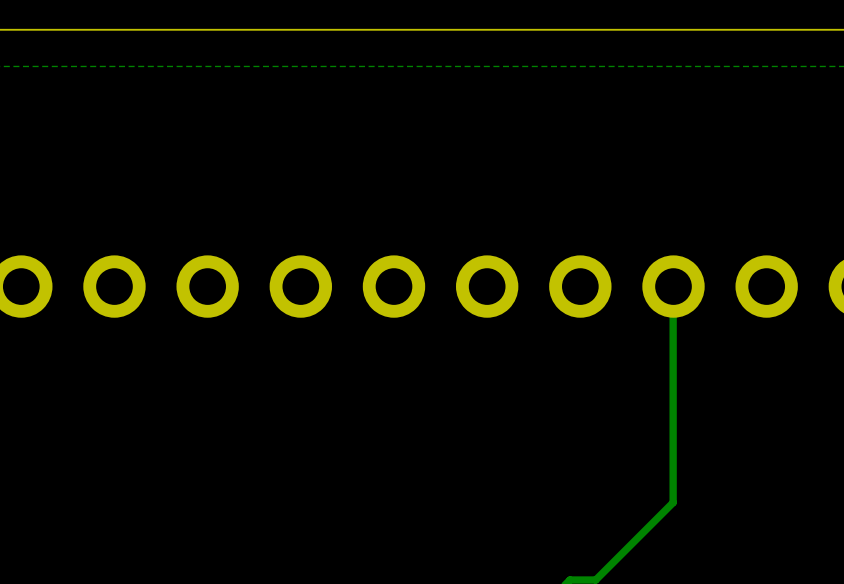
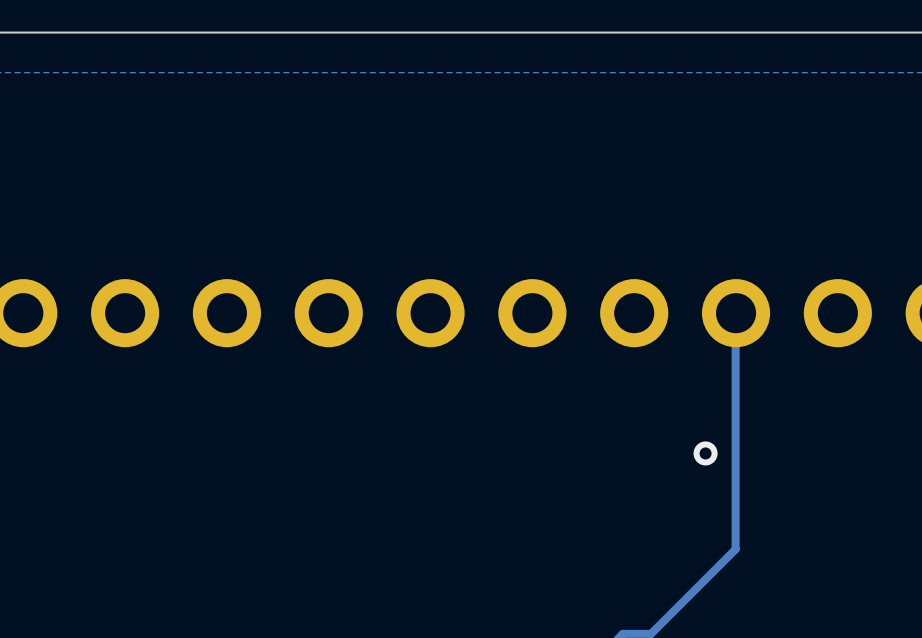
via: none -> (705, 453)

